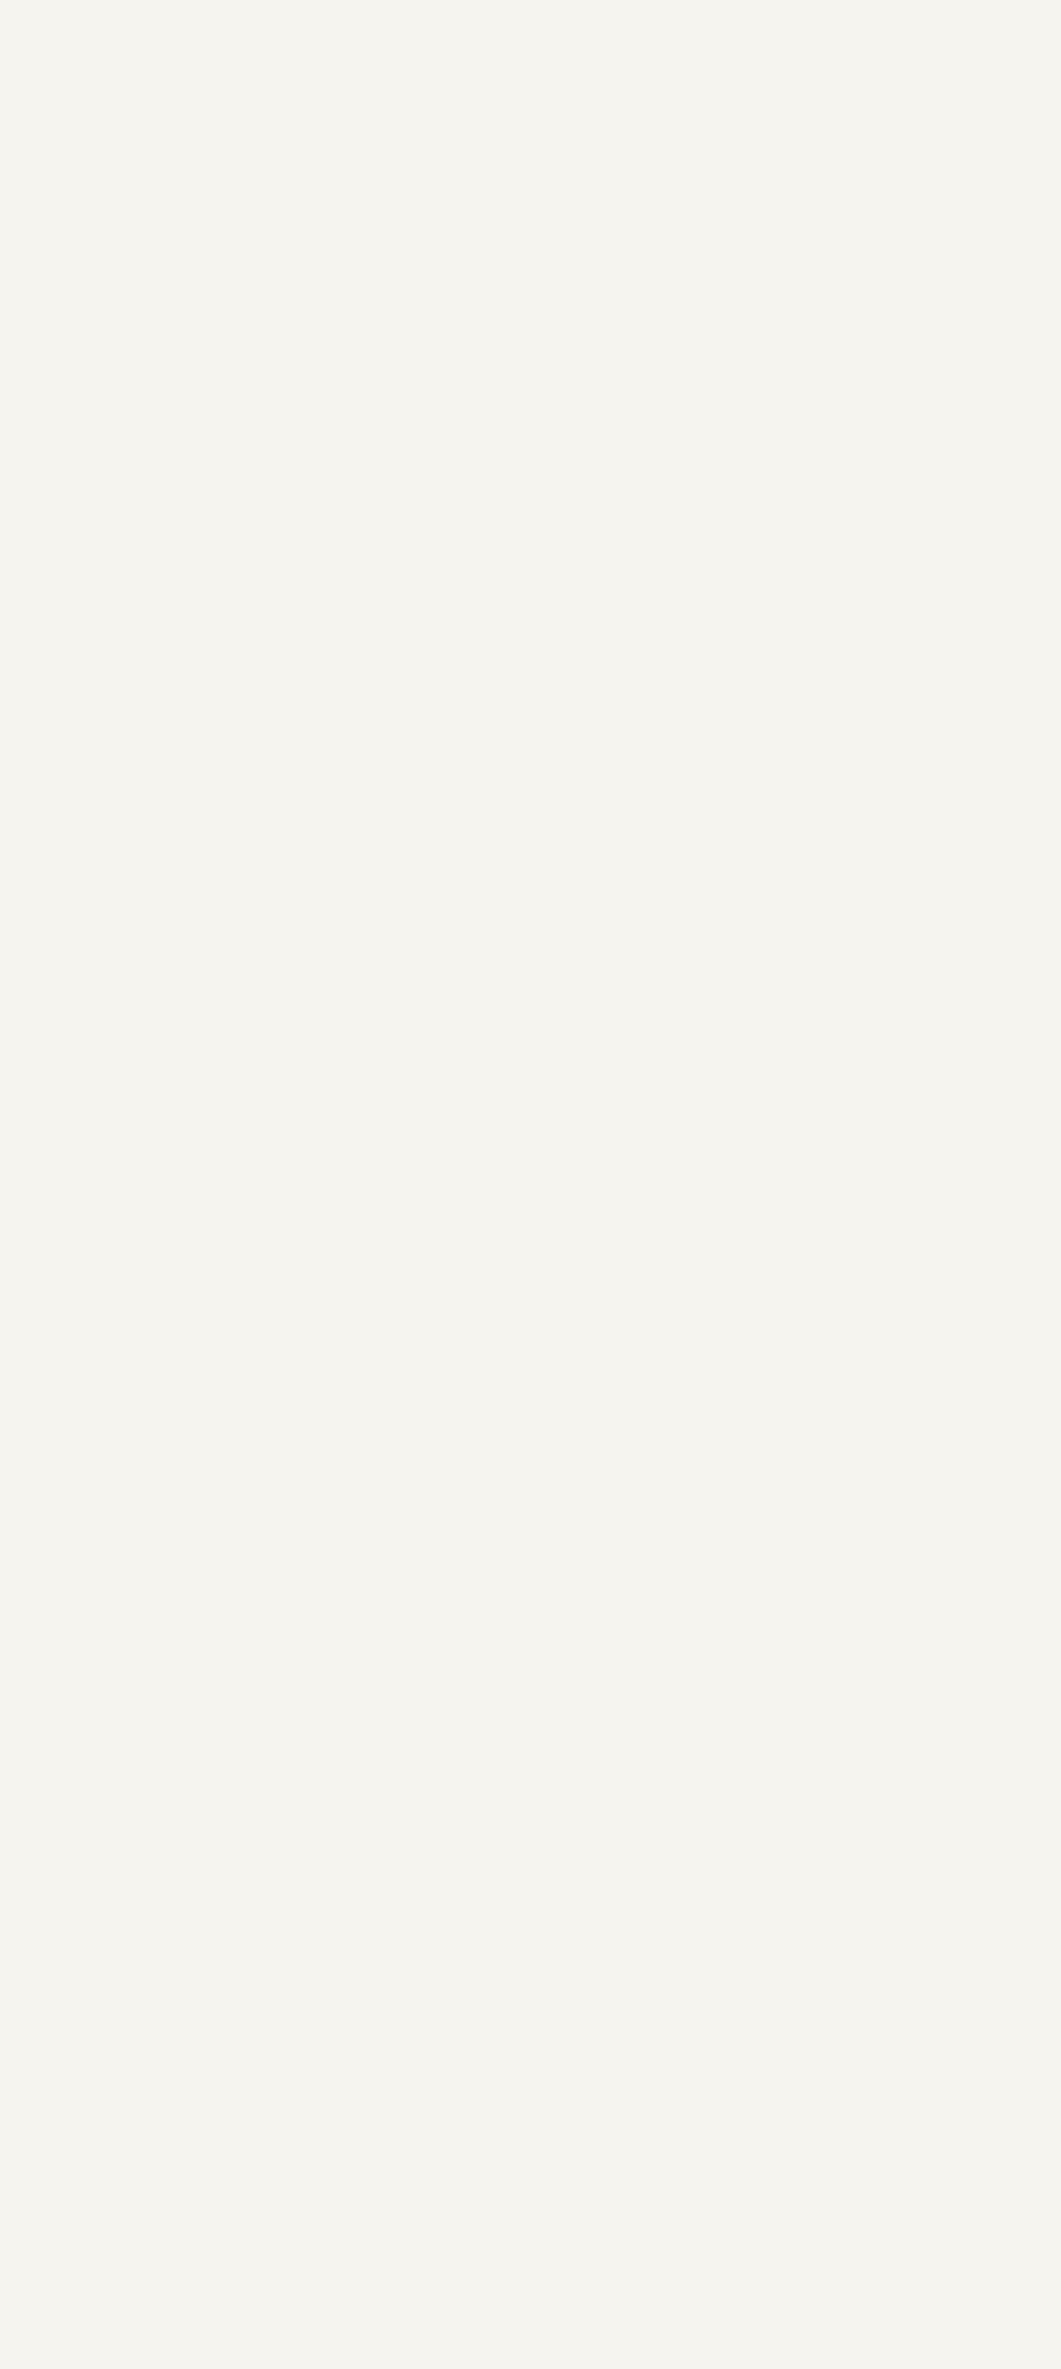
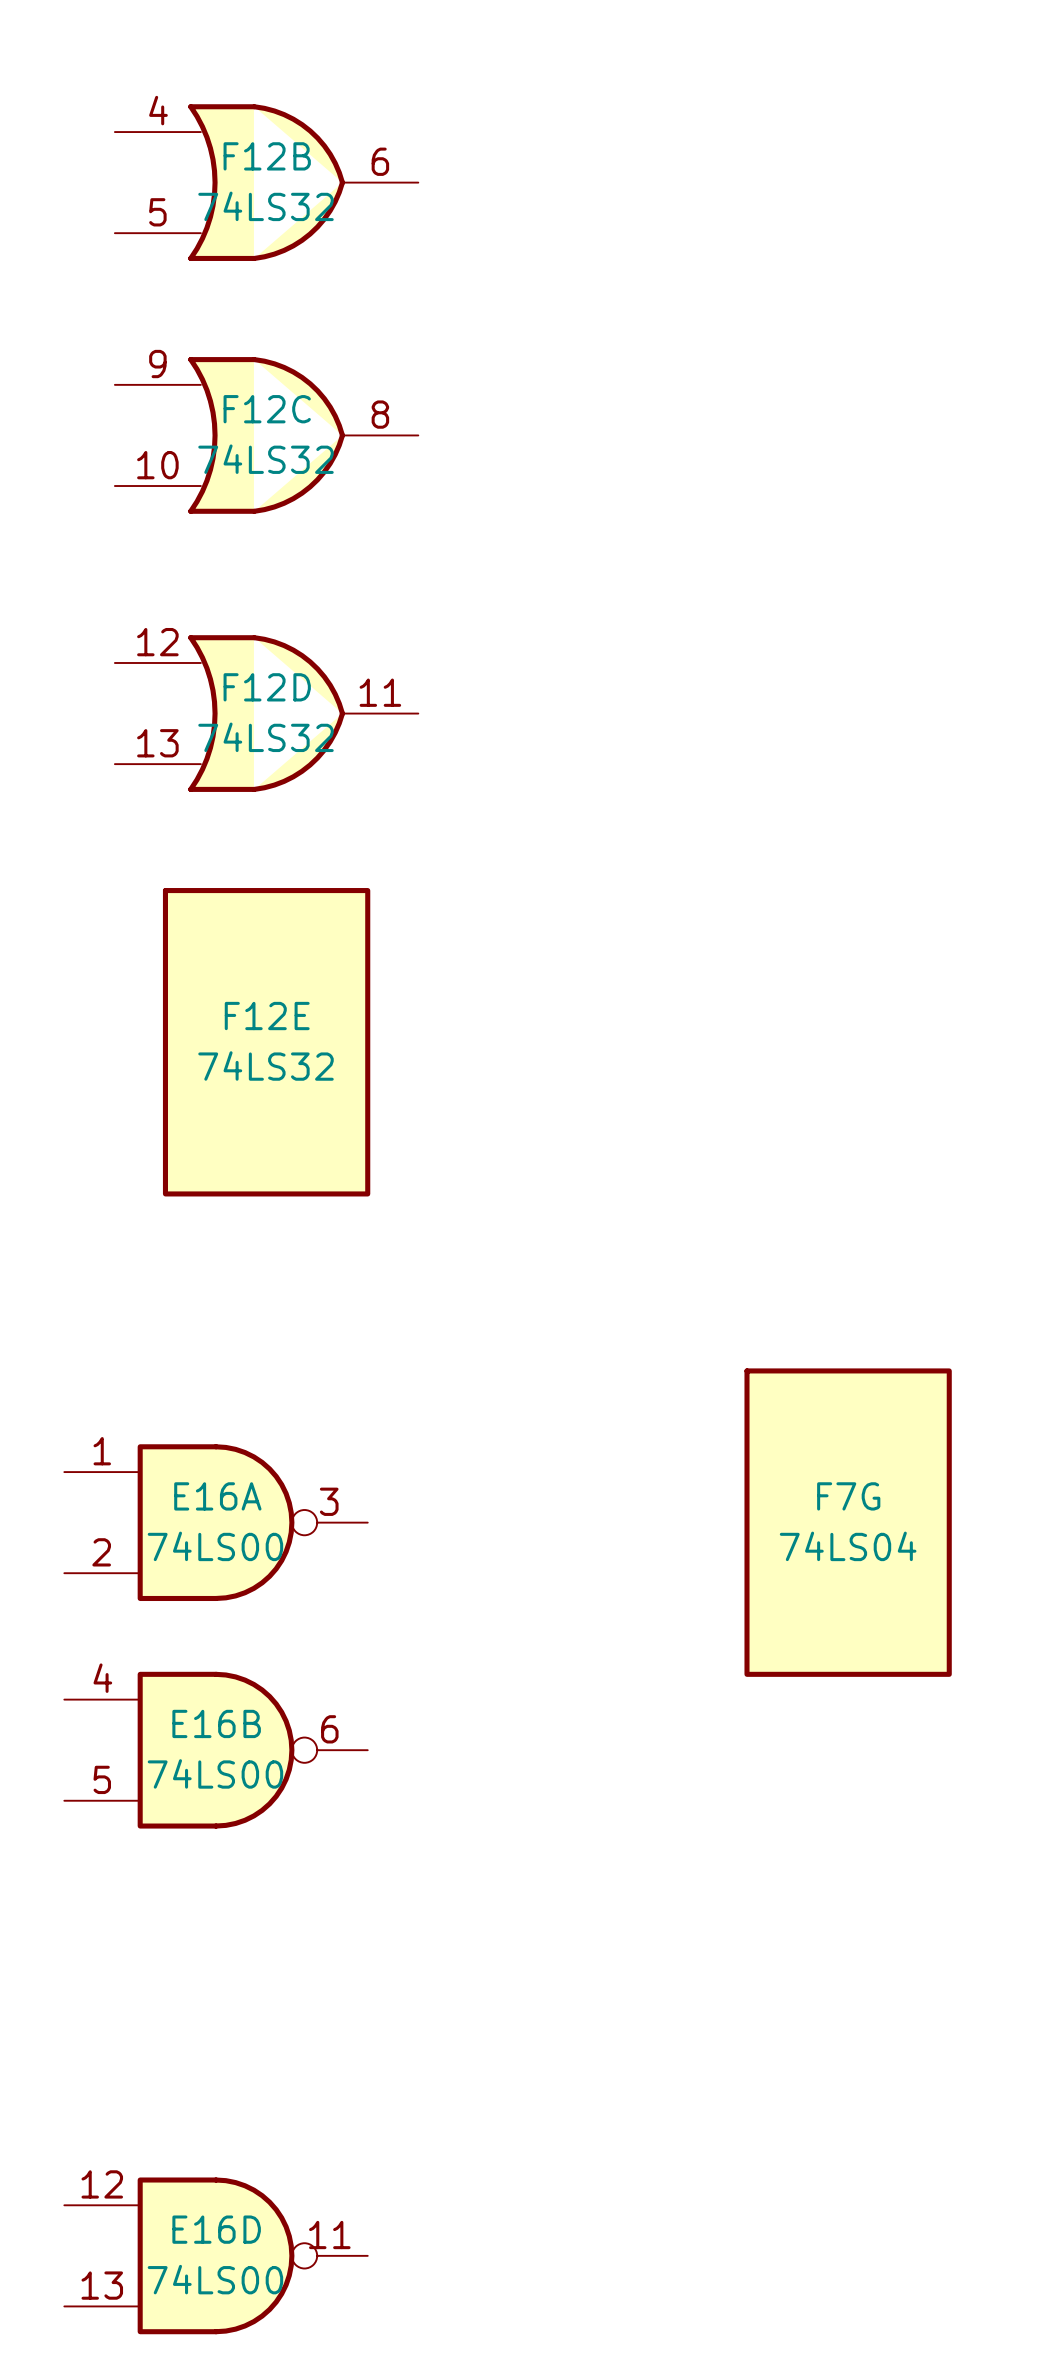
F12B: none -> 74LS32 (266, 182)
F12C: none -> 74LS32 (266, 435)
F12D: none -> 74LS32 (266, 713)
F12E: none -> 74LS32 (266, 1042)
E16A: none -> 74LS00 (216, 1522)
F7G: none -> 74LS04 (848, 1522)
E16B: none -> 74LS00 (216, 1750)
E16D: none -> 74LS00 (216, 2255)

